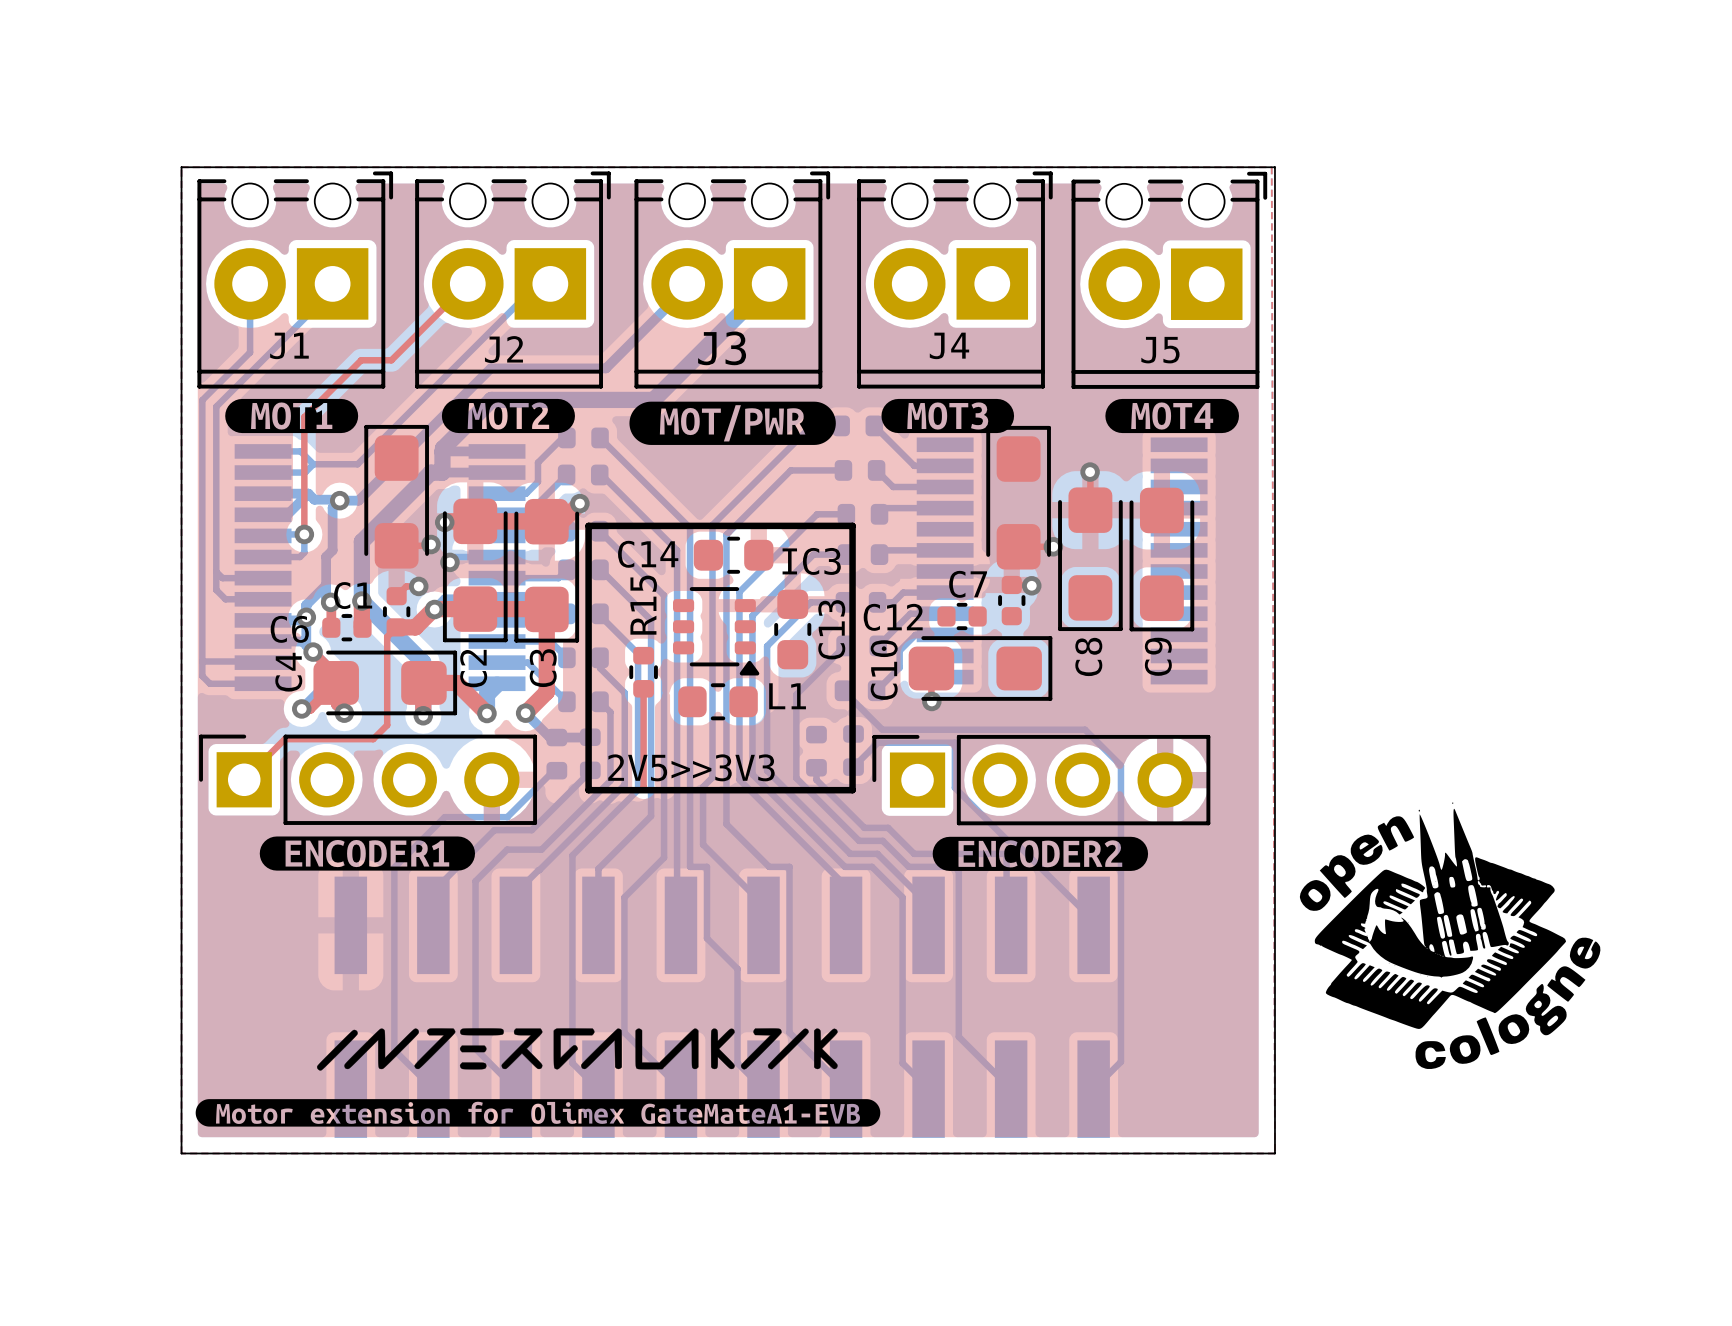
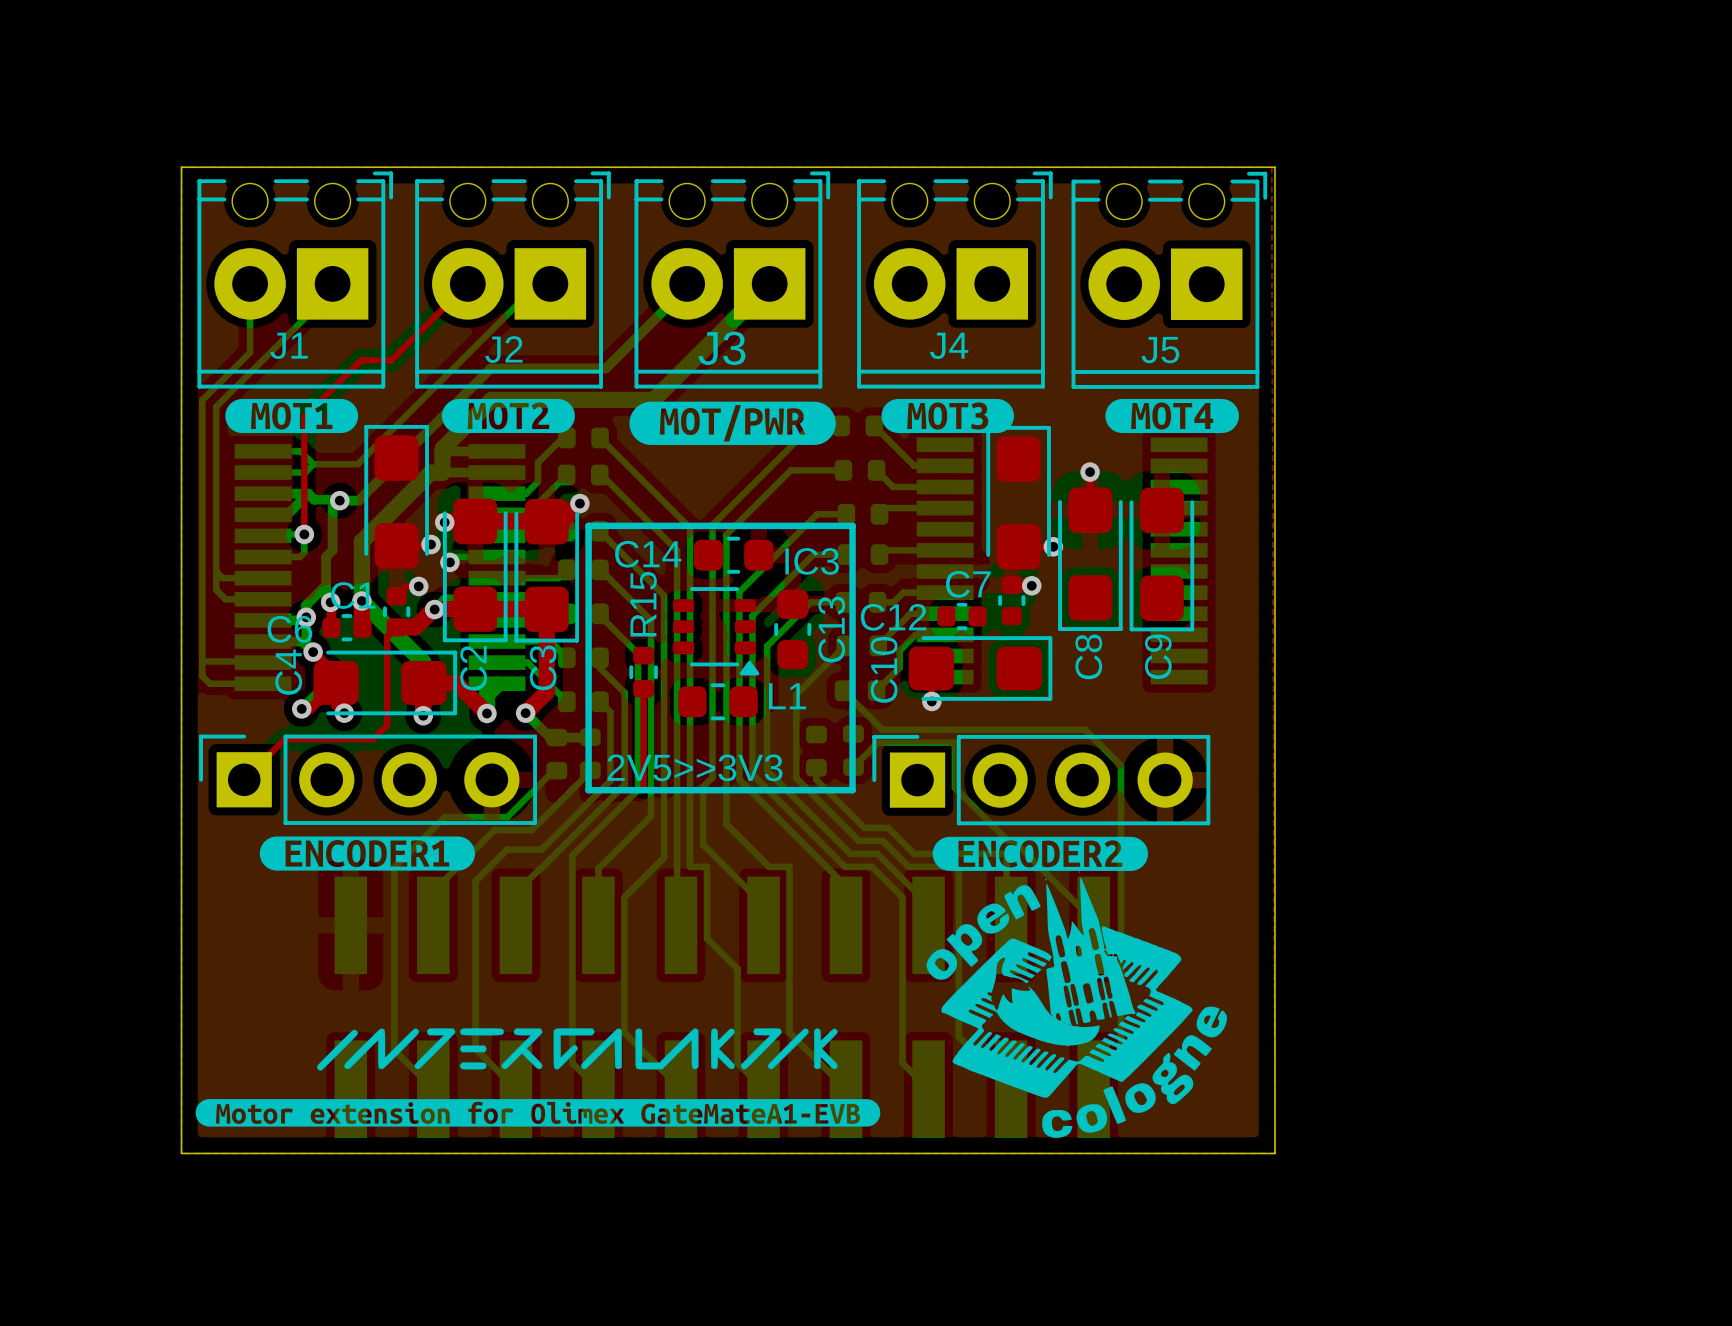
drawing position: (1450, 935) -> (1076, 1004)

